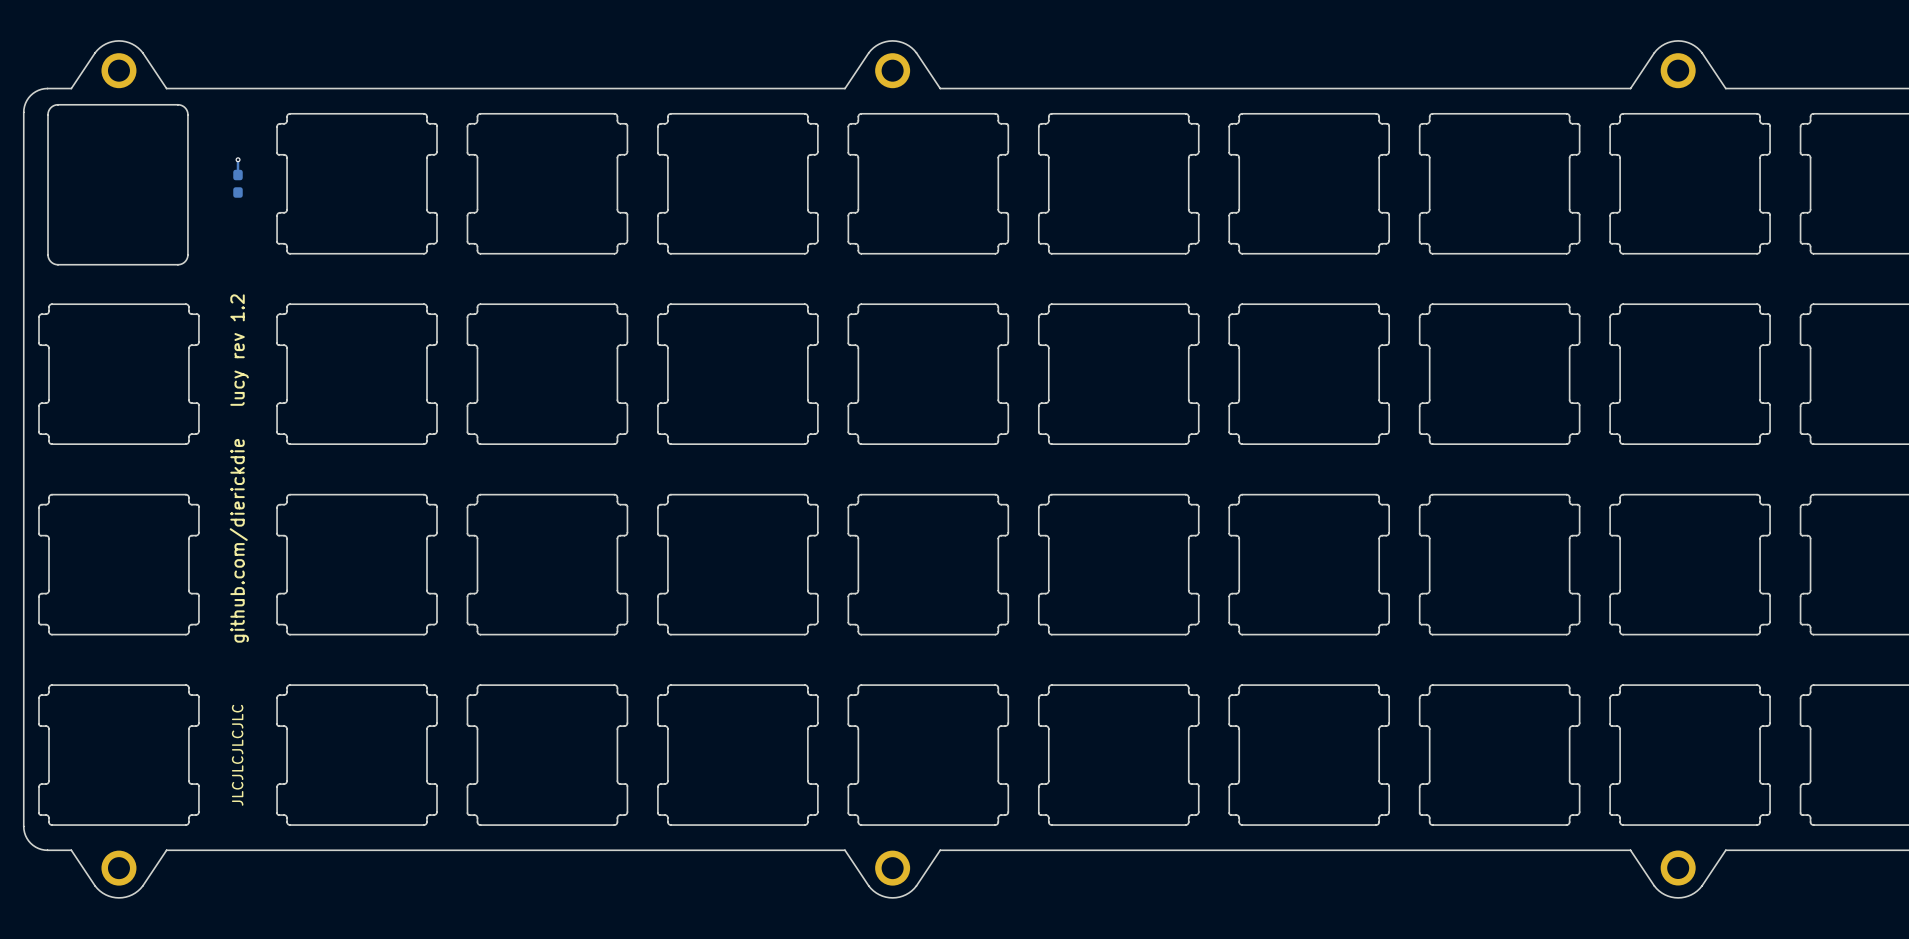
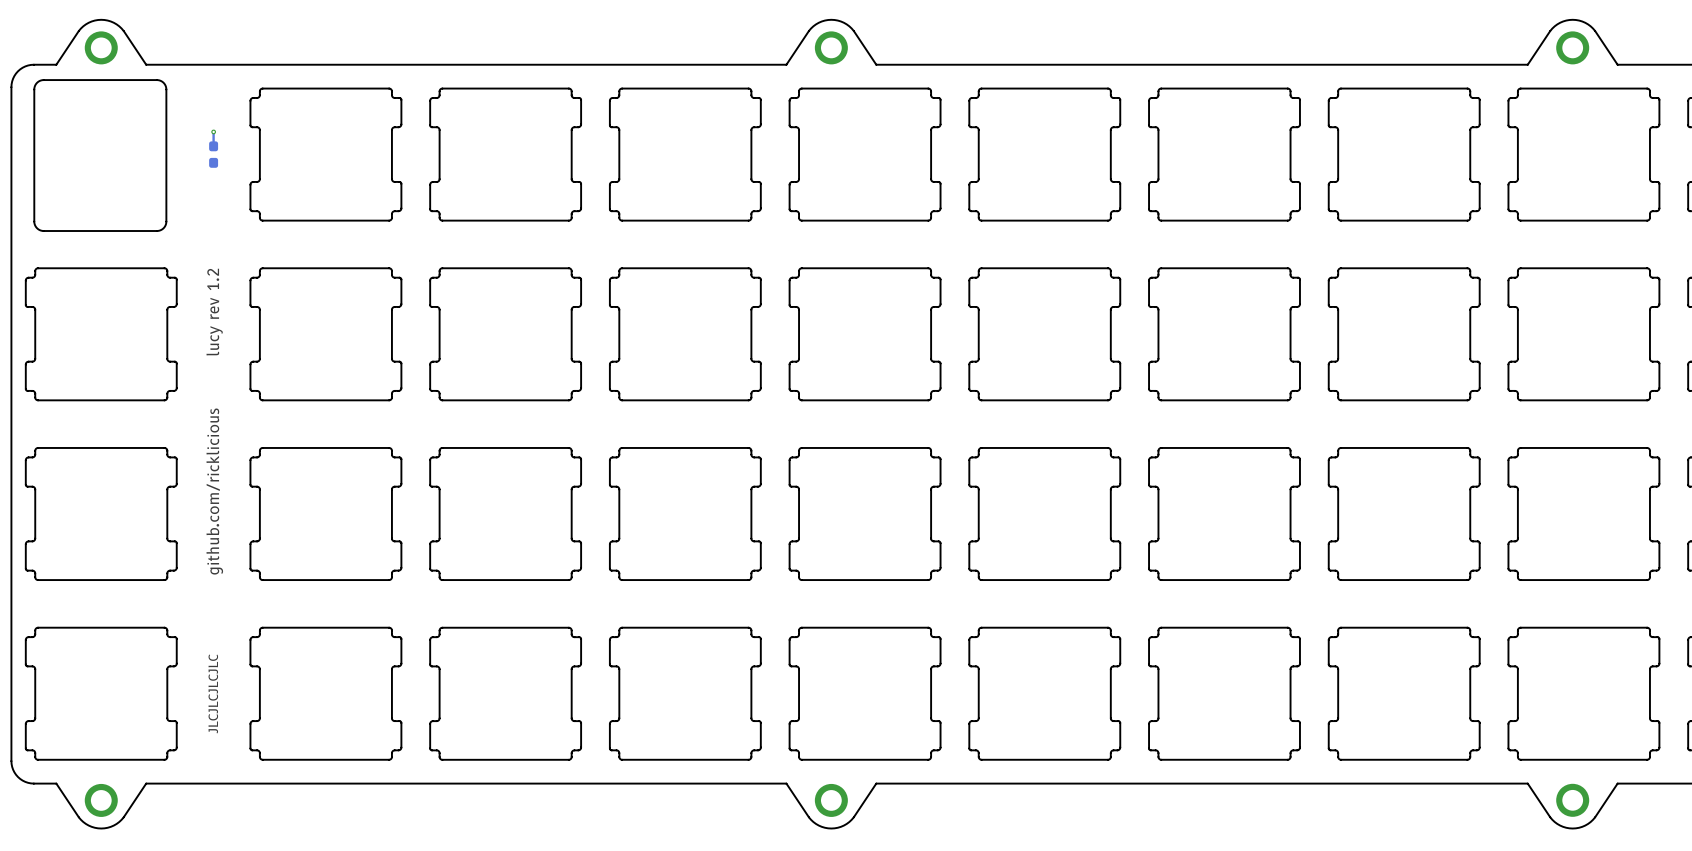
text: github.com/dierickdie (239, 540) -> github.com/ricklicious (214, 491)

